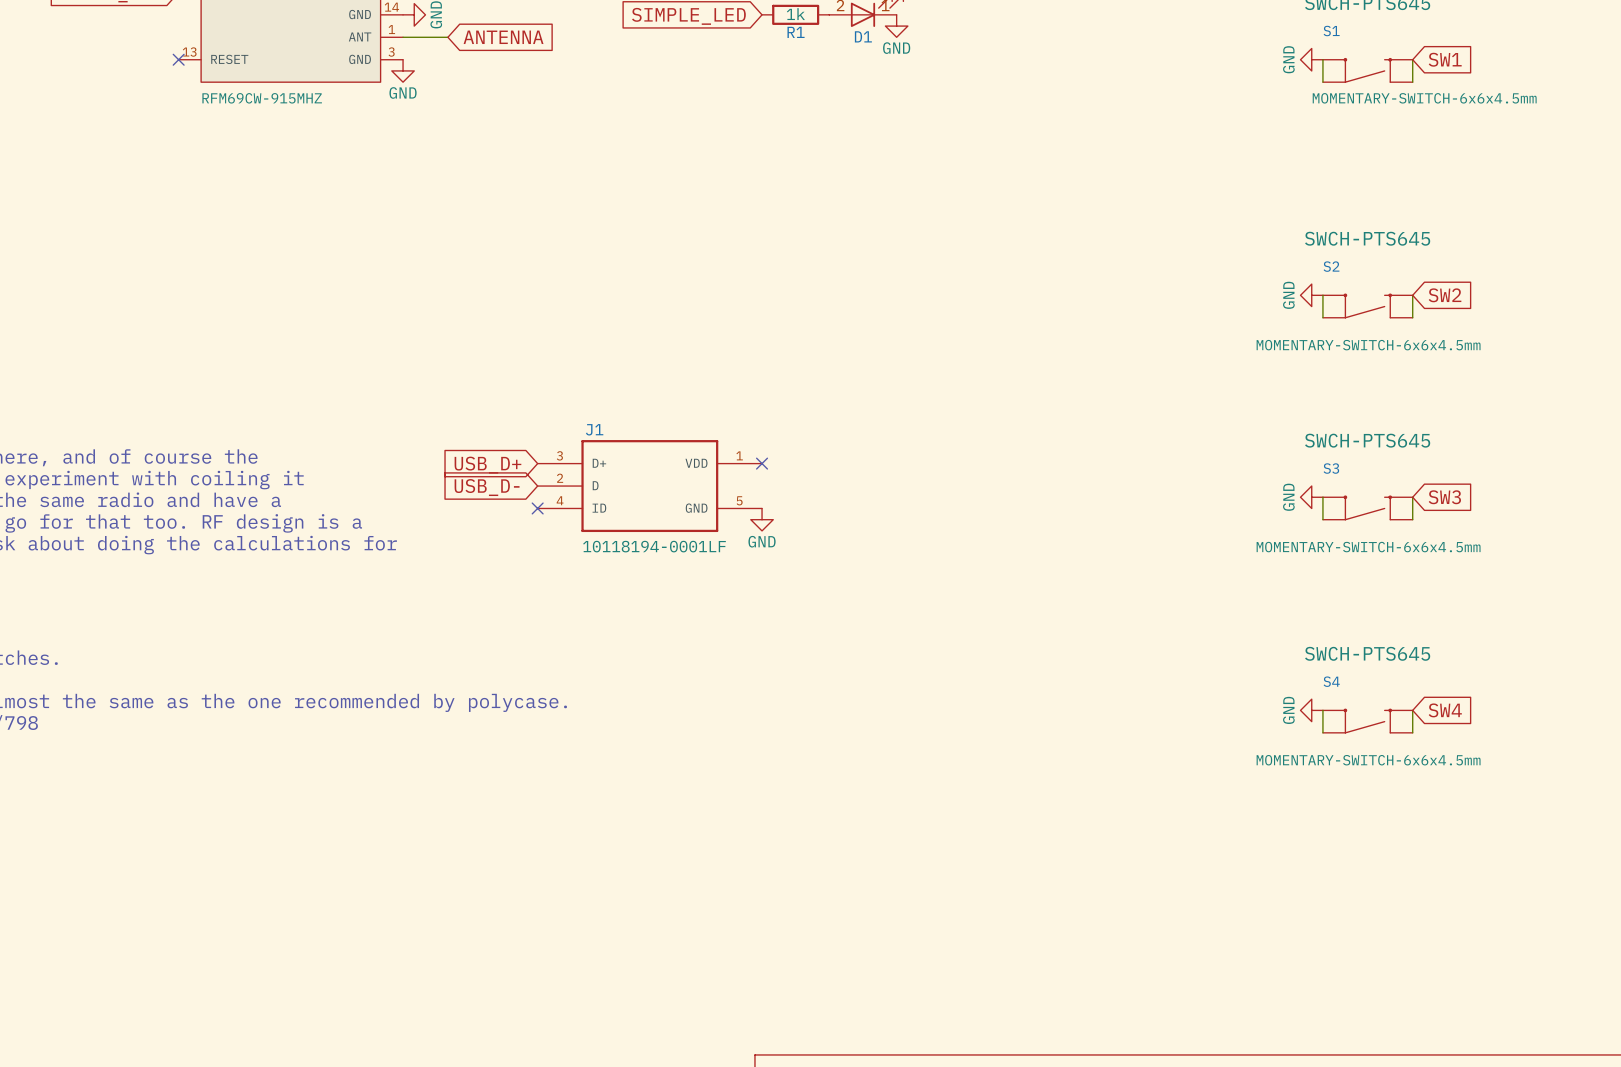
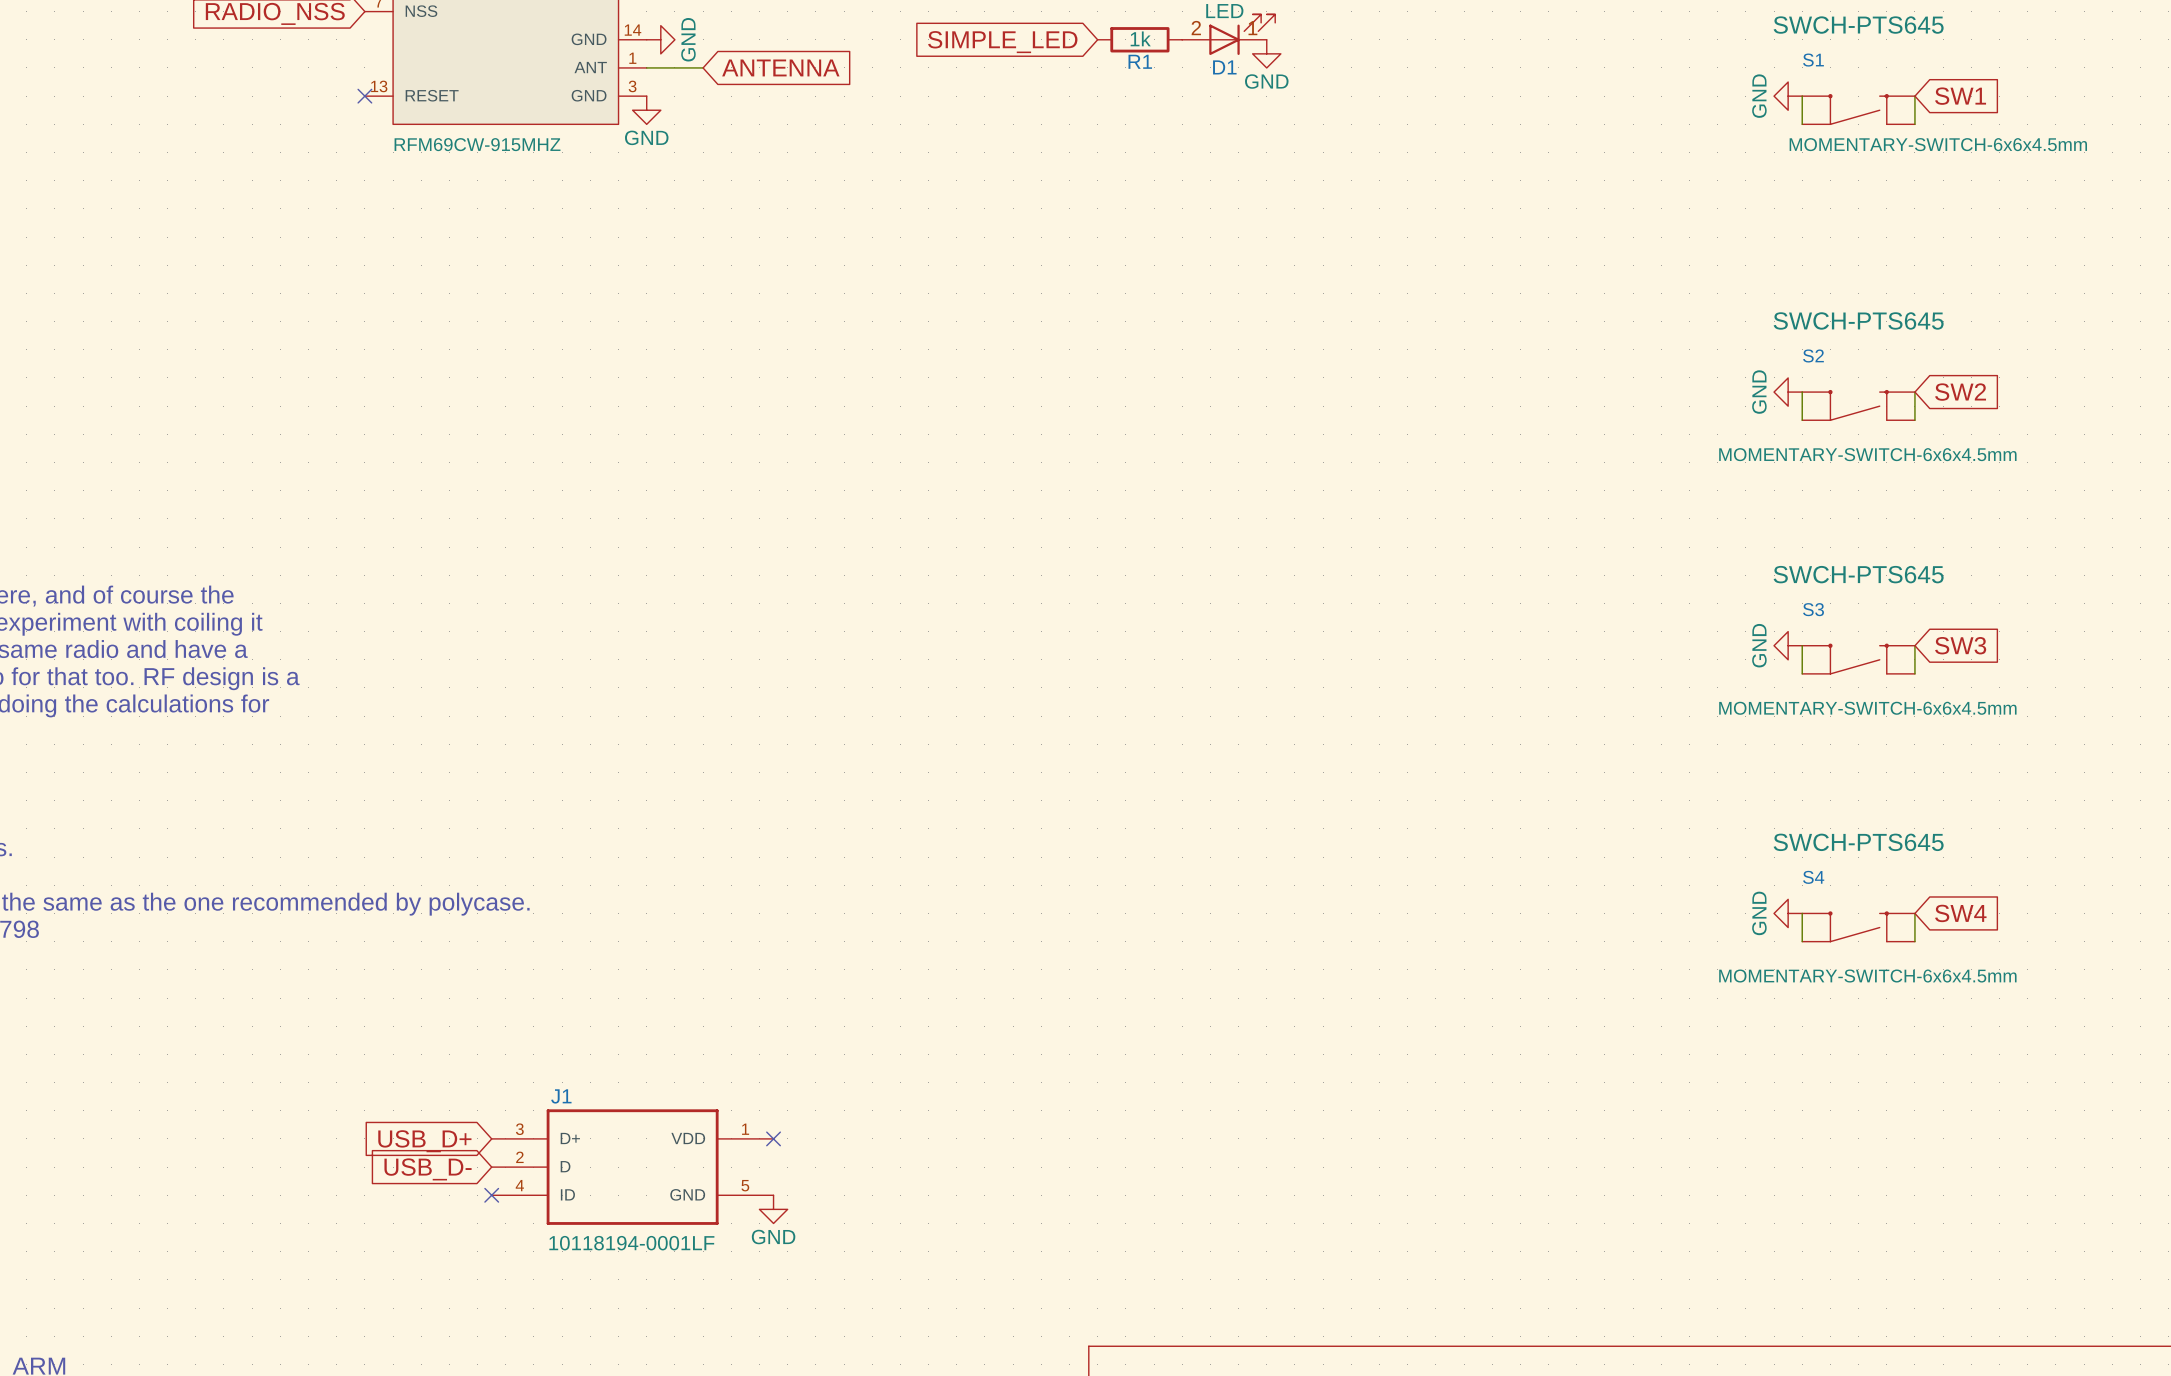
no-connect mark: (762, 463) -> none
global label: USB_D+ (487, 465) -> none
J1 position: (649, 486) -> (632, 1167)
global label: USB_D- (487, 487) -> none
no-connect mark: (537, 508) -> none
power symbol: GND (762, 519) -> none
no-connect mark: none -> (773, 1138)
global label: none -> USB_D+ (424, 1141)
global label: none -> USB_D- (428, 1169)
no-connect mark: none -> (491, 1195)
power symbol: none -> GND (773, 1209)

